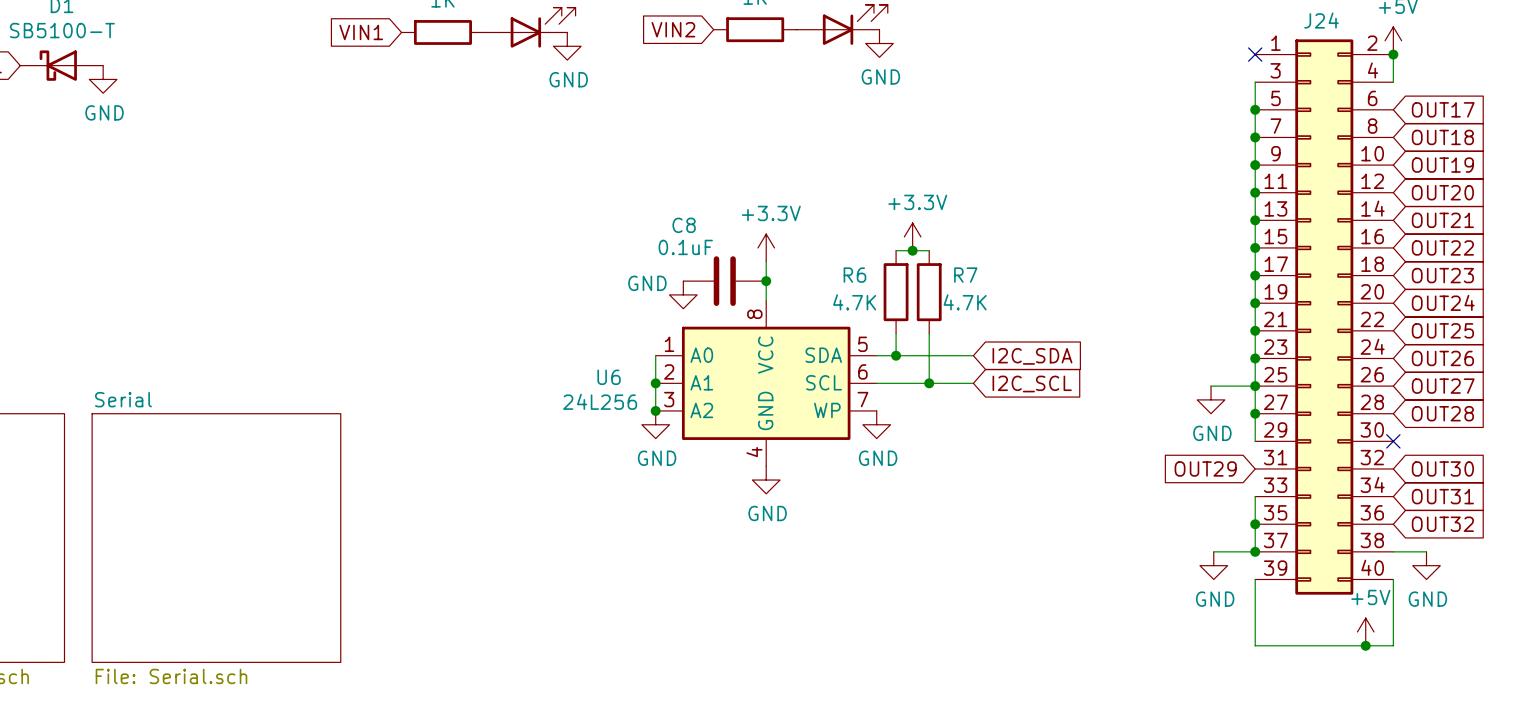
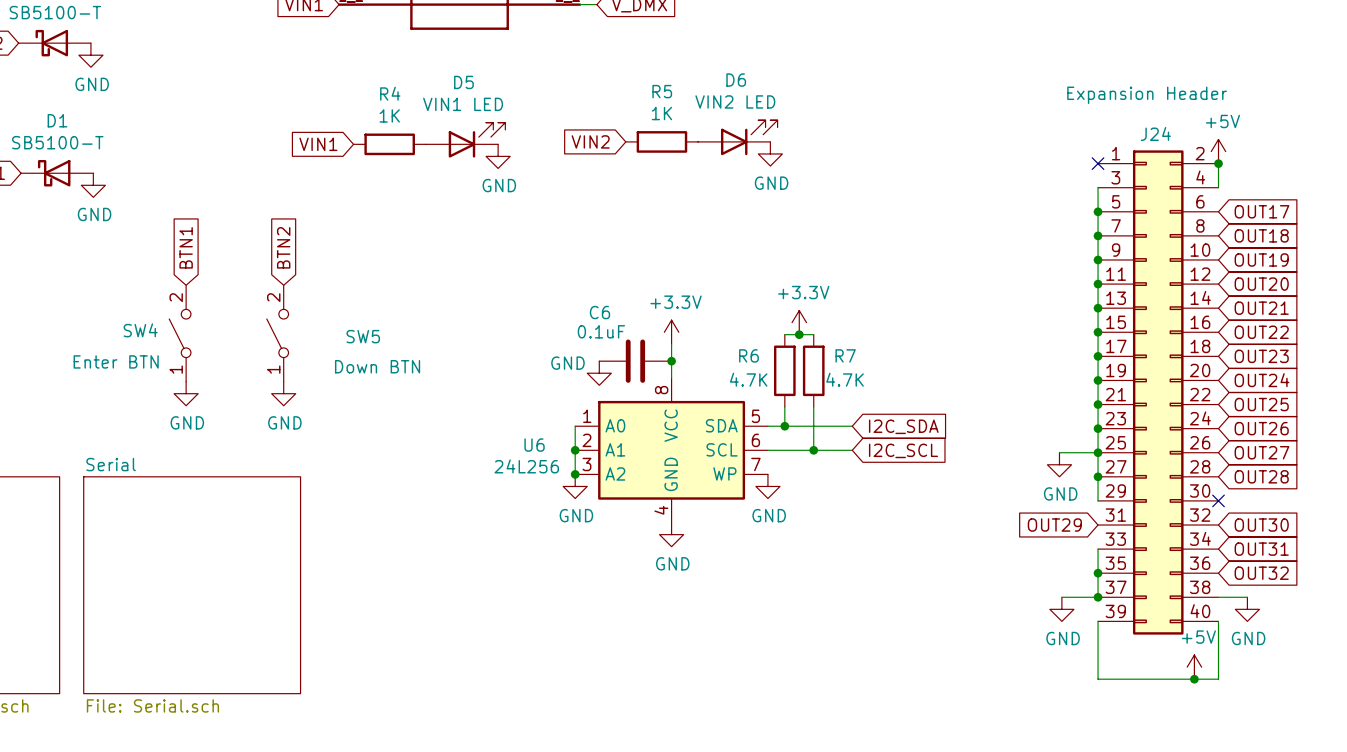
global label: none -> BTN1 (186, 247)
global label: none -> BTN2 (283, 247)
C8 name: C8 (684, 225) -> C6 (599, 312)
SW4: none -> Enter BTN (180, 333)
SW5: none -> Down BTN (277, 333)
power symbol: none -> GND (186, 393)
power symbol: none -> GND (283, 393)

